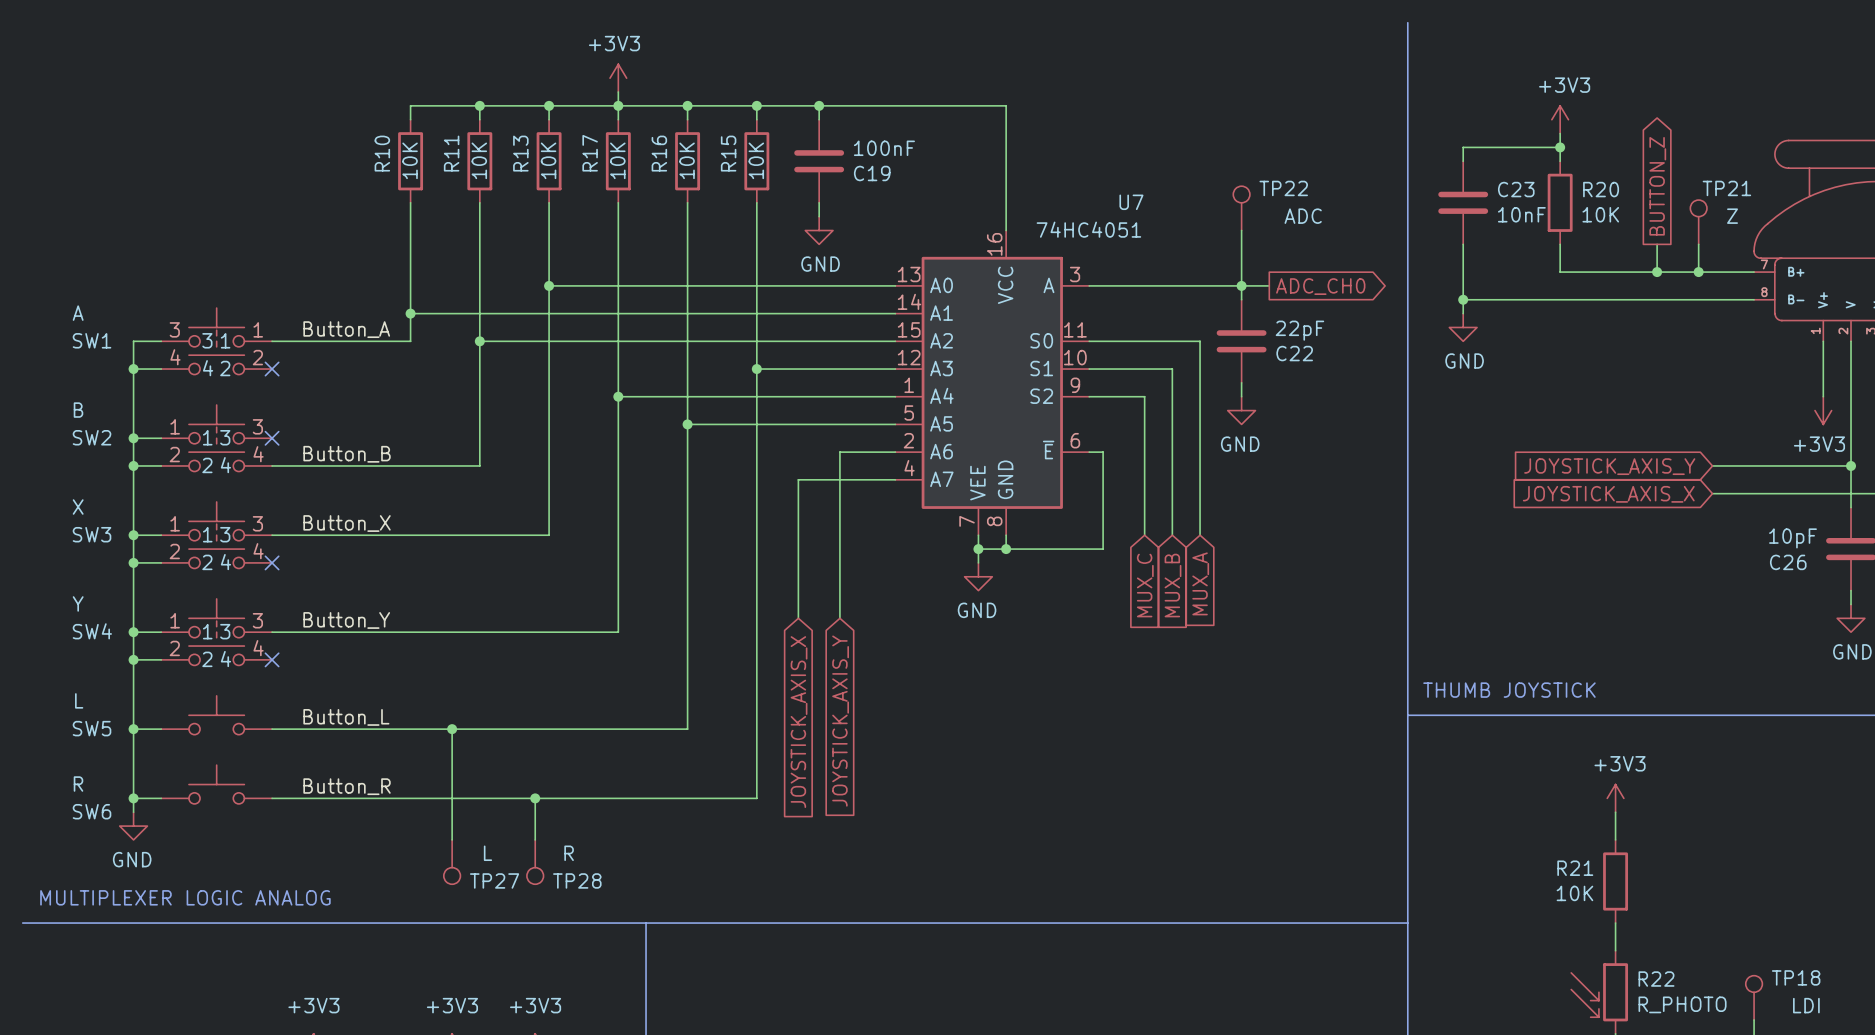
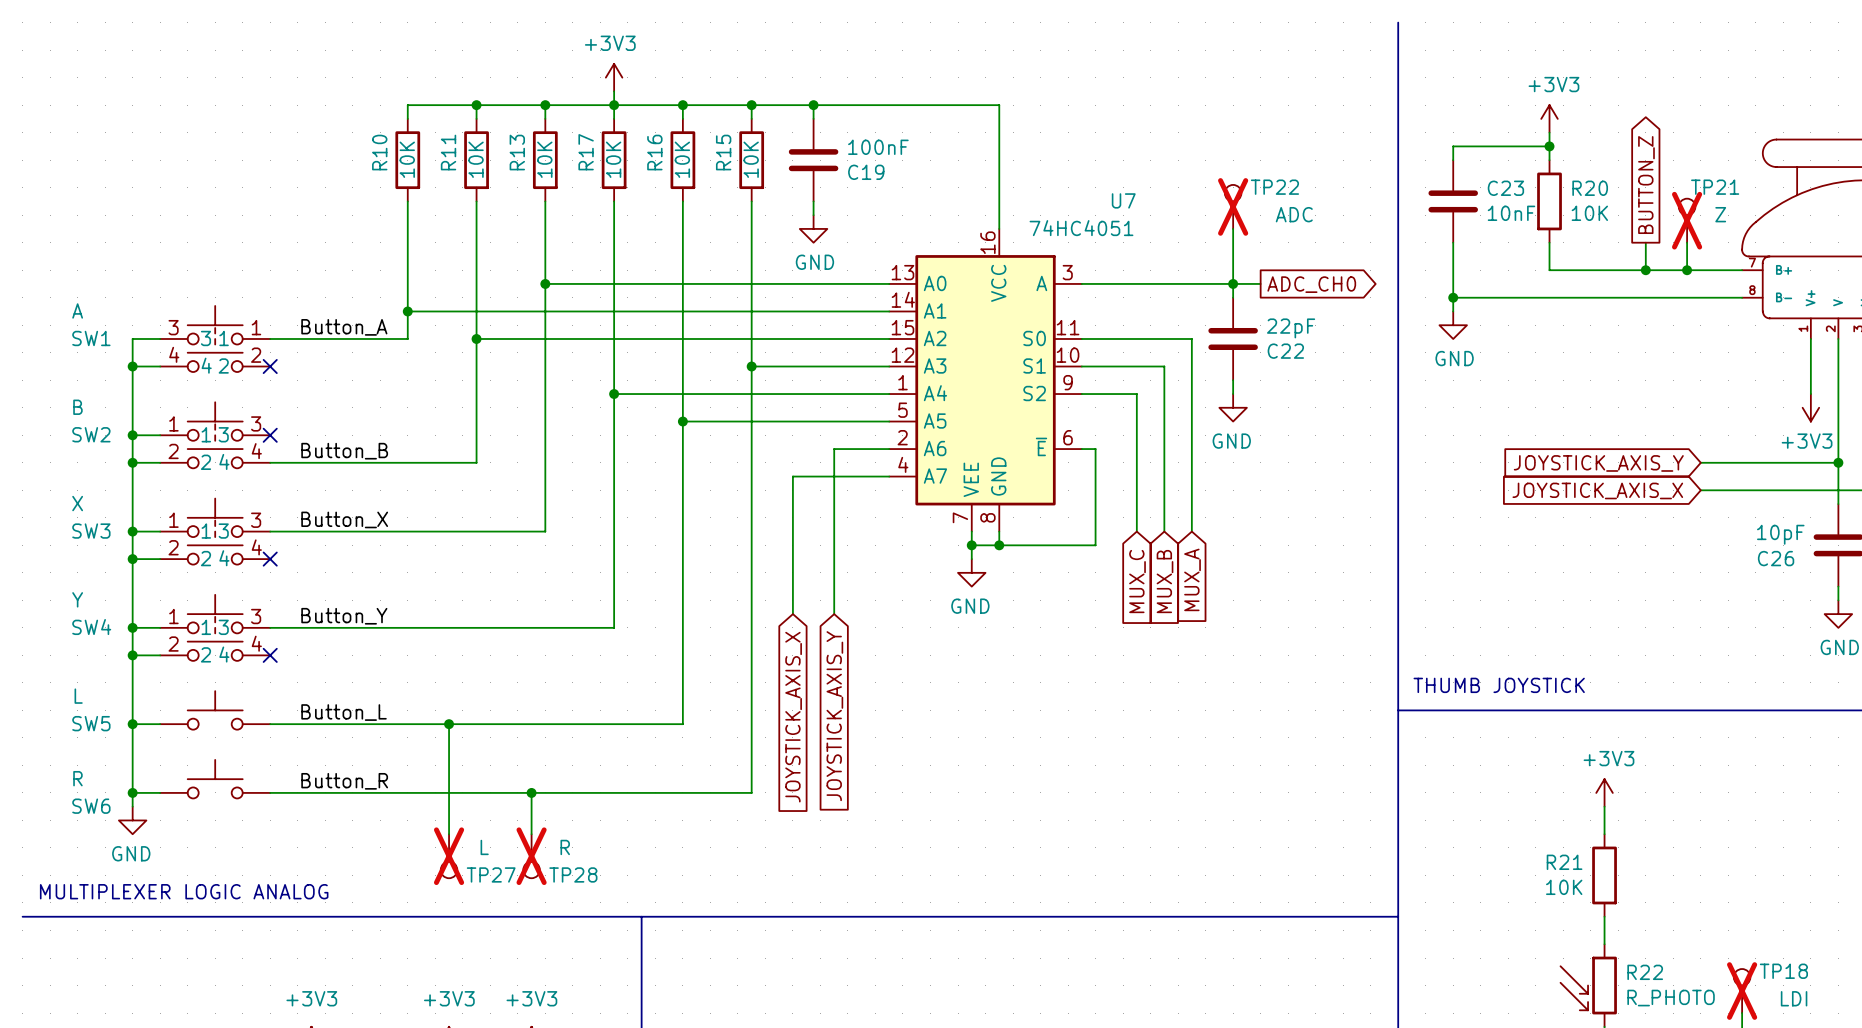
TP22 do-not-place cross: none -> (1233, 206)
TP21 do-not-place cross: none -> (1687, 220)
TP27 do-not-place cross: none -> (449, 856)
TP28 do-not-place cross: none -> (531, 856)
TP18 do-not-place cross: none -> (1742, 991)

